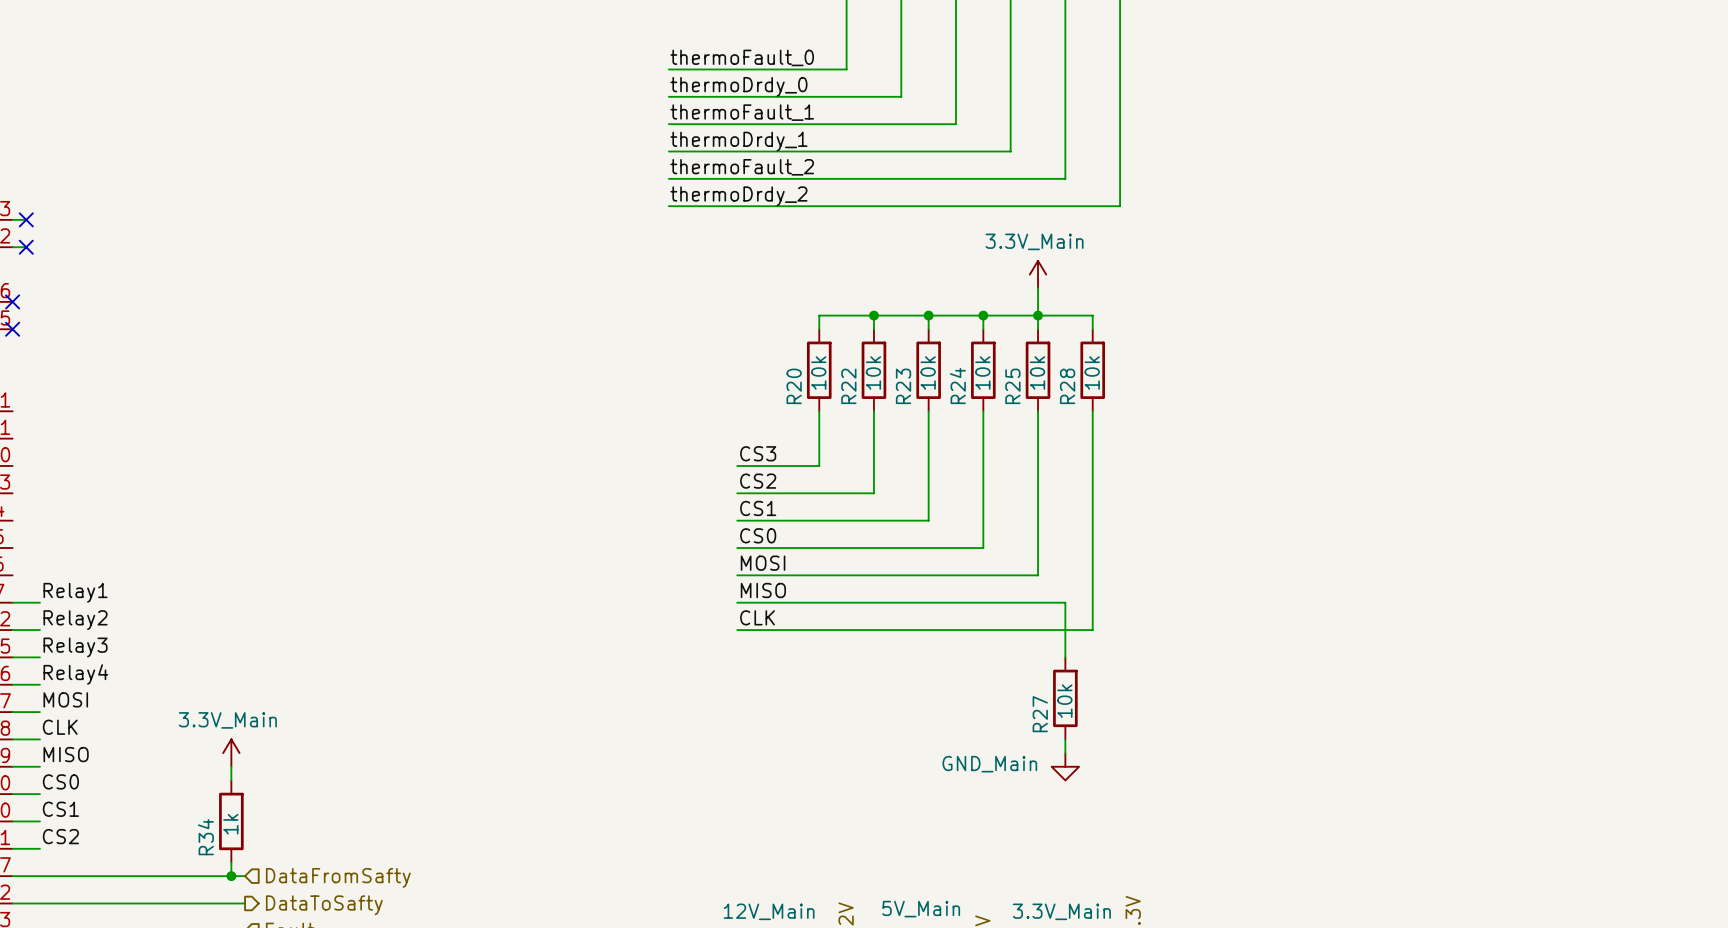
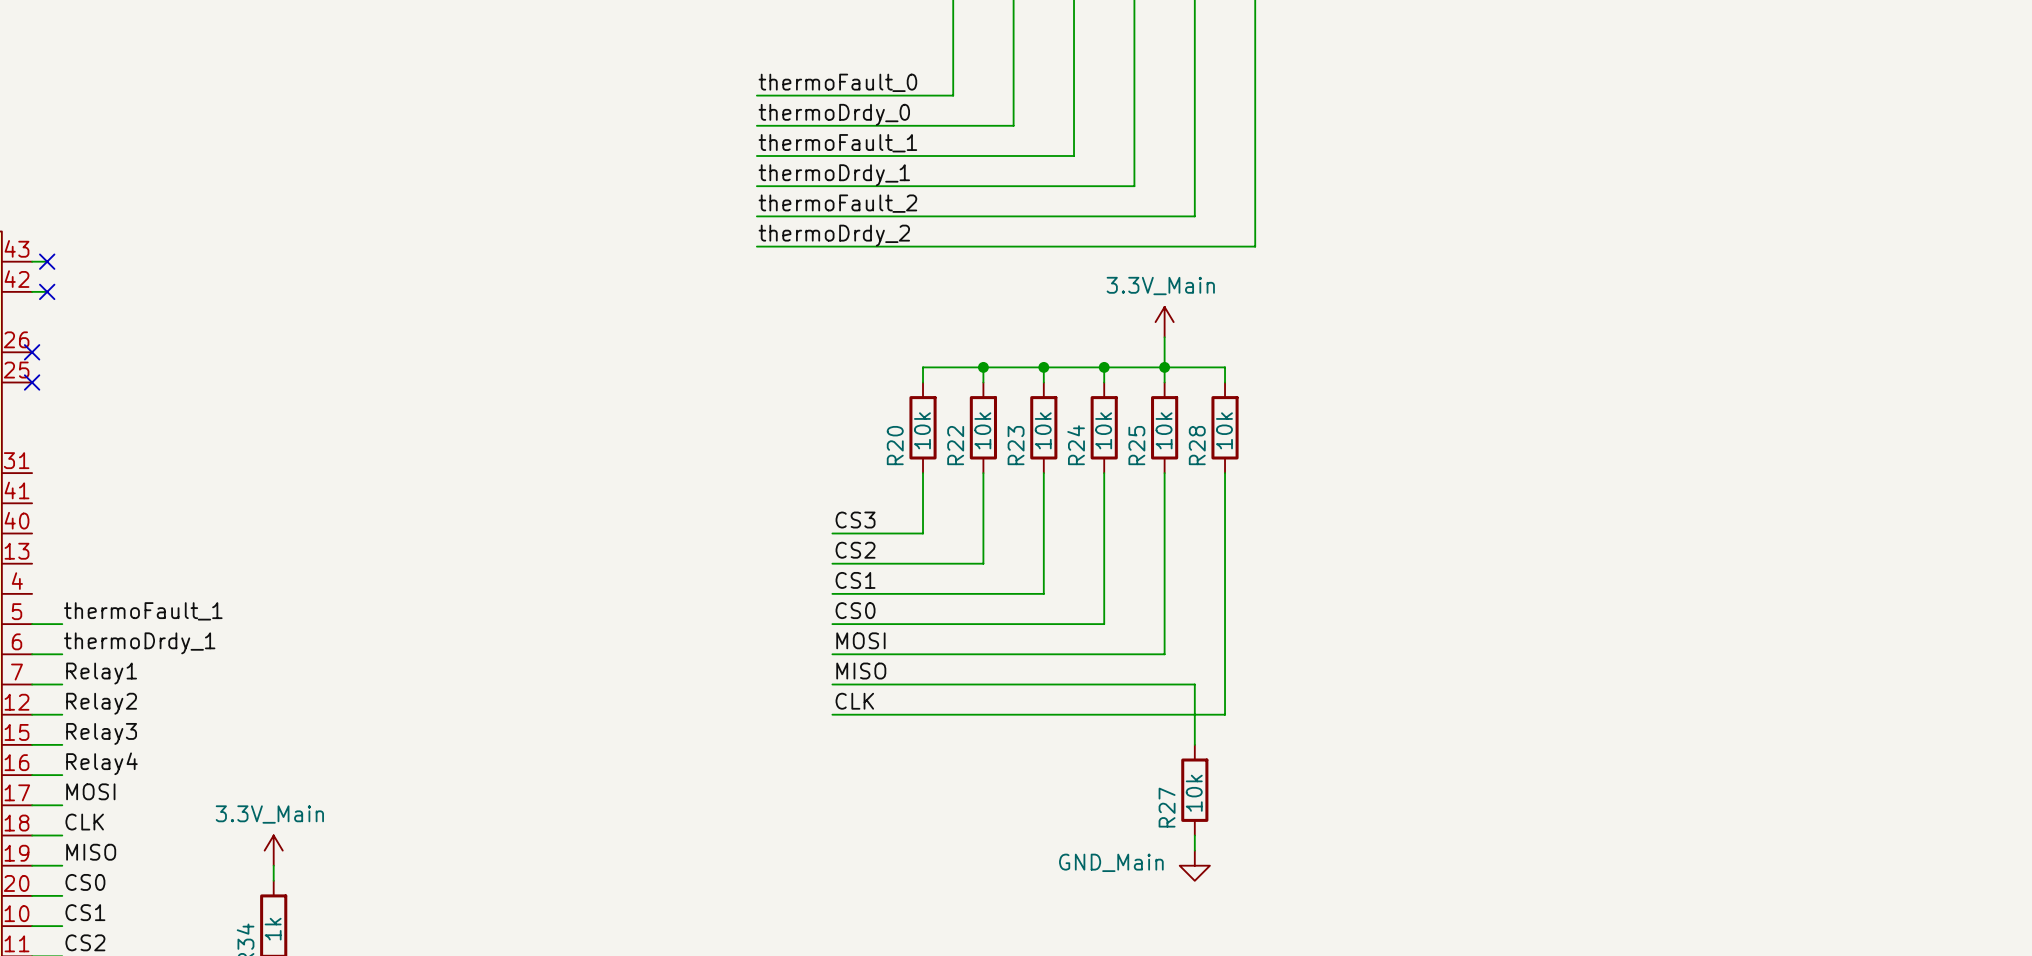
label: none -> thermoFault_1 (143, 611)
wire: none -> (32, 624) (62, 624)
label: none -> thermoDrdy_1 (139, 643)
wire: none -> (32, 654) (62, 654)

